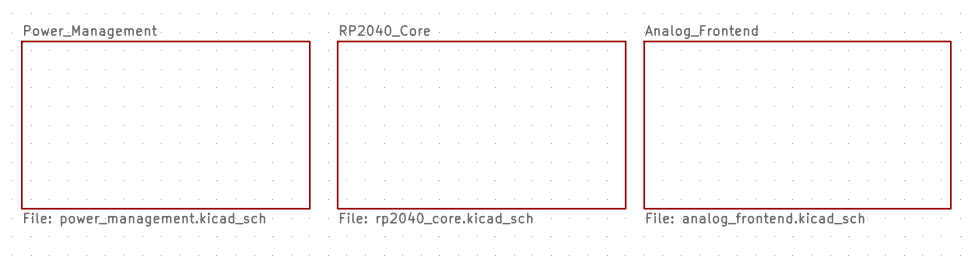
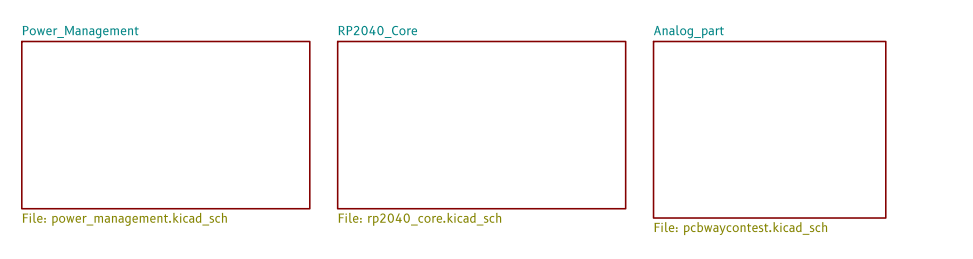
sheet Analog_Frontend: File: analog_frontend.kicad_sch (797, 125) -> none
sheet Analog_part: none -> File: pcbwaycontest.kicad_sch (769, 129)

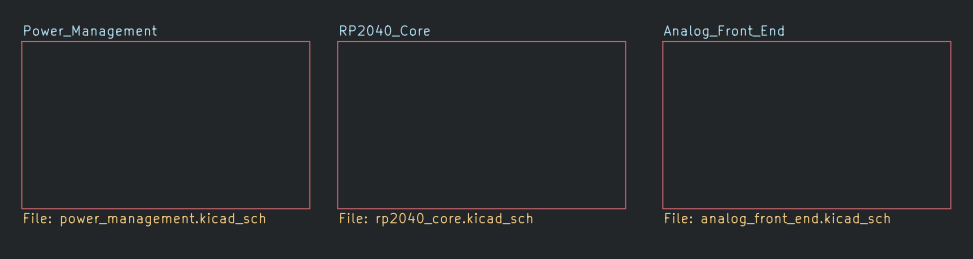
sheet Analog_Front_End: none -> File: analog_front_end.kicad_sch (806, 125)
sheet Analog_part: File: pcbwaycontest.kicad_sch (769, 129) -> none

